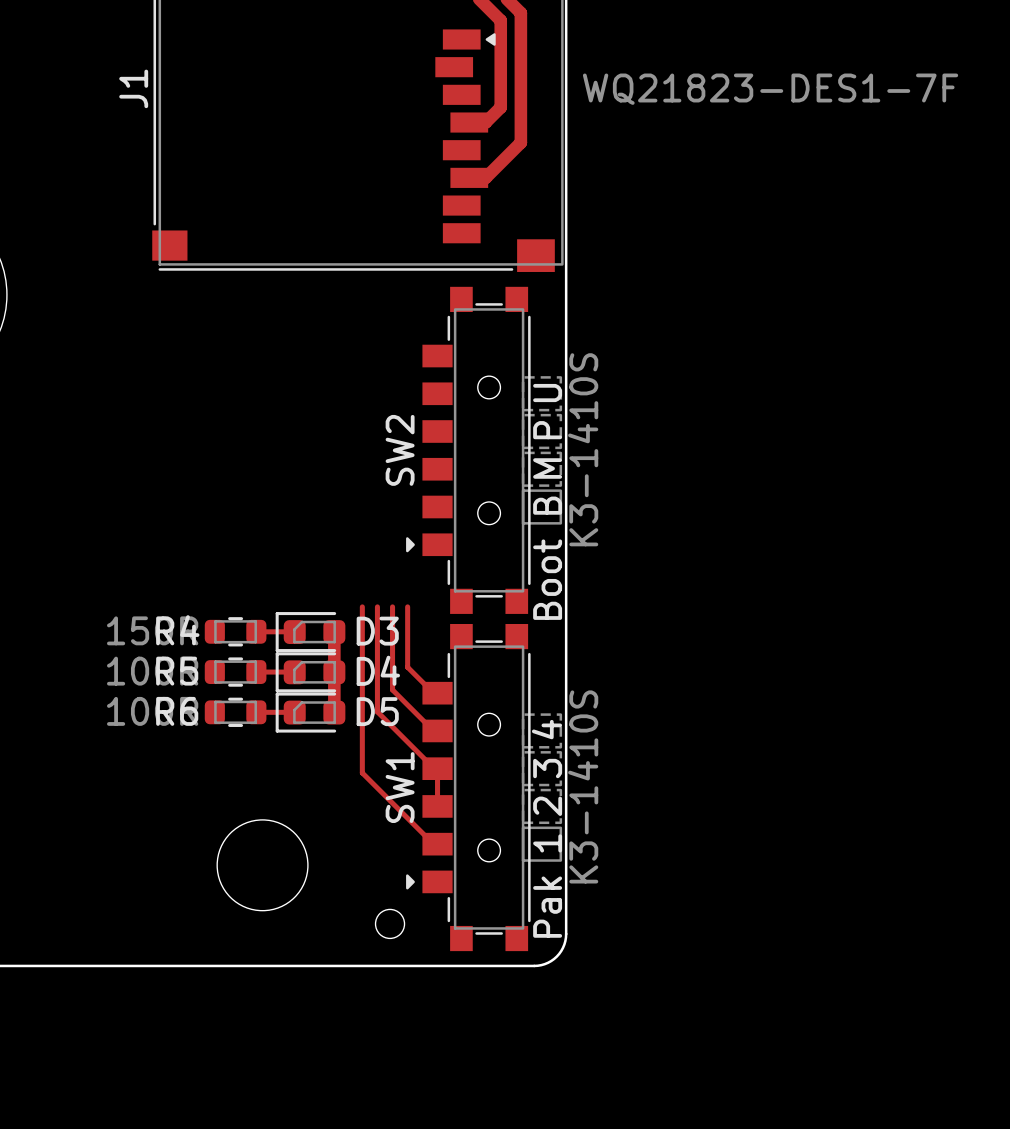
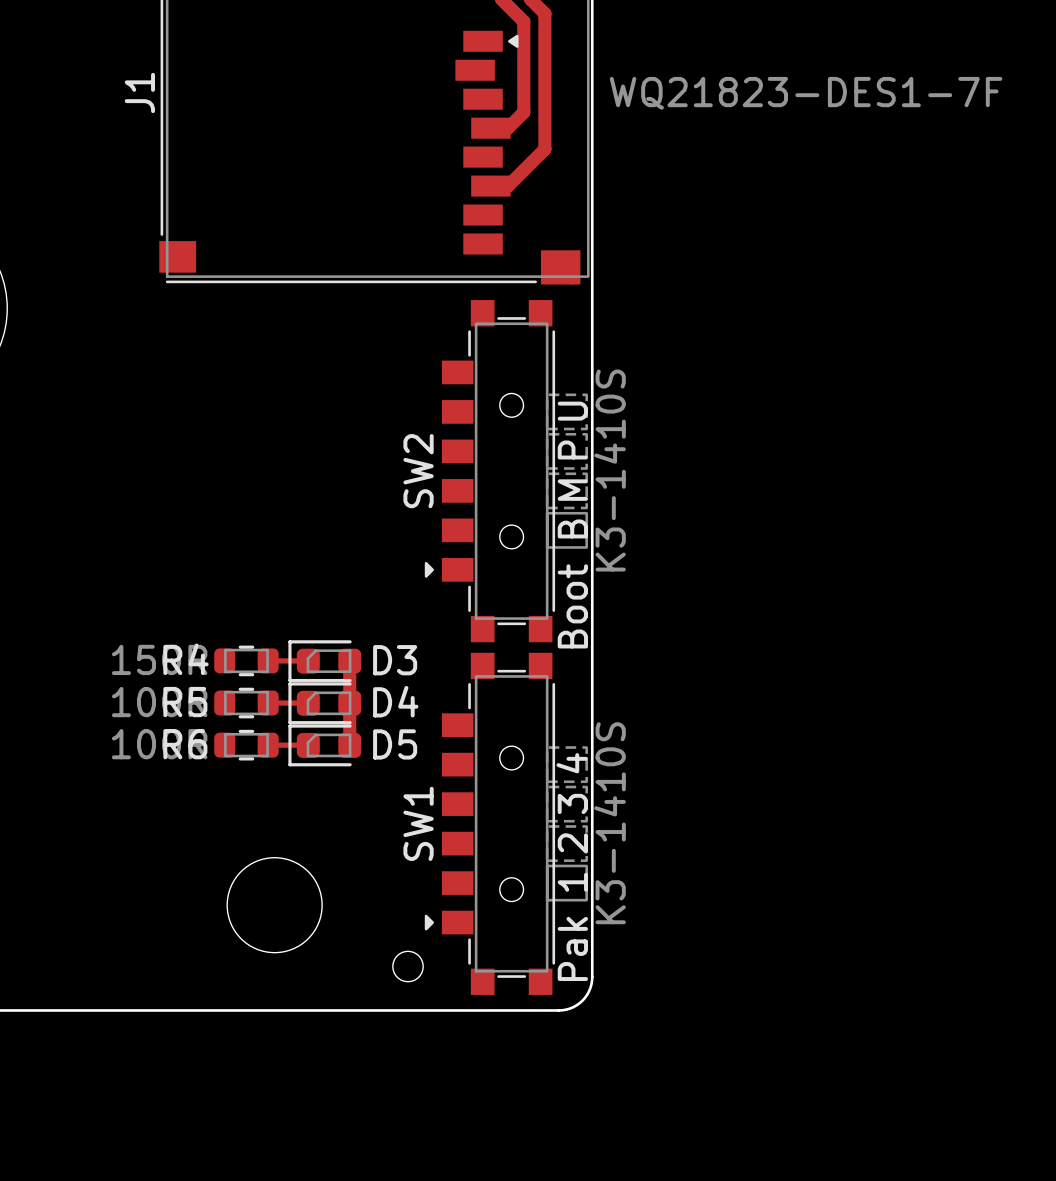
track: (362, 606) (362, 772) (433, 844) (437, 844) -> none
track: (377, 606) (377, 711) (434, 768) (437, 768) (437, 806) -> none
track: (392, 606) (392, 689) (433, 730) (437, 730) -> none
track: (407, 606) (407, 667) (433, 693) (437, 693) -> none

